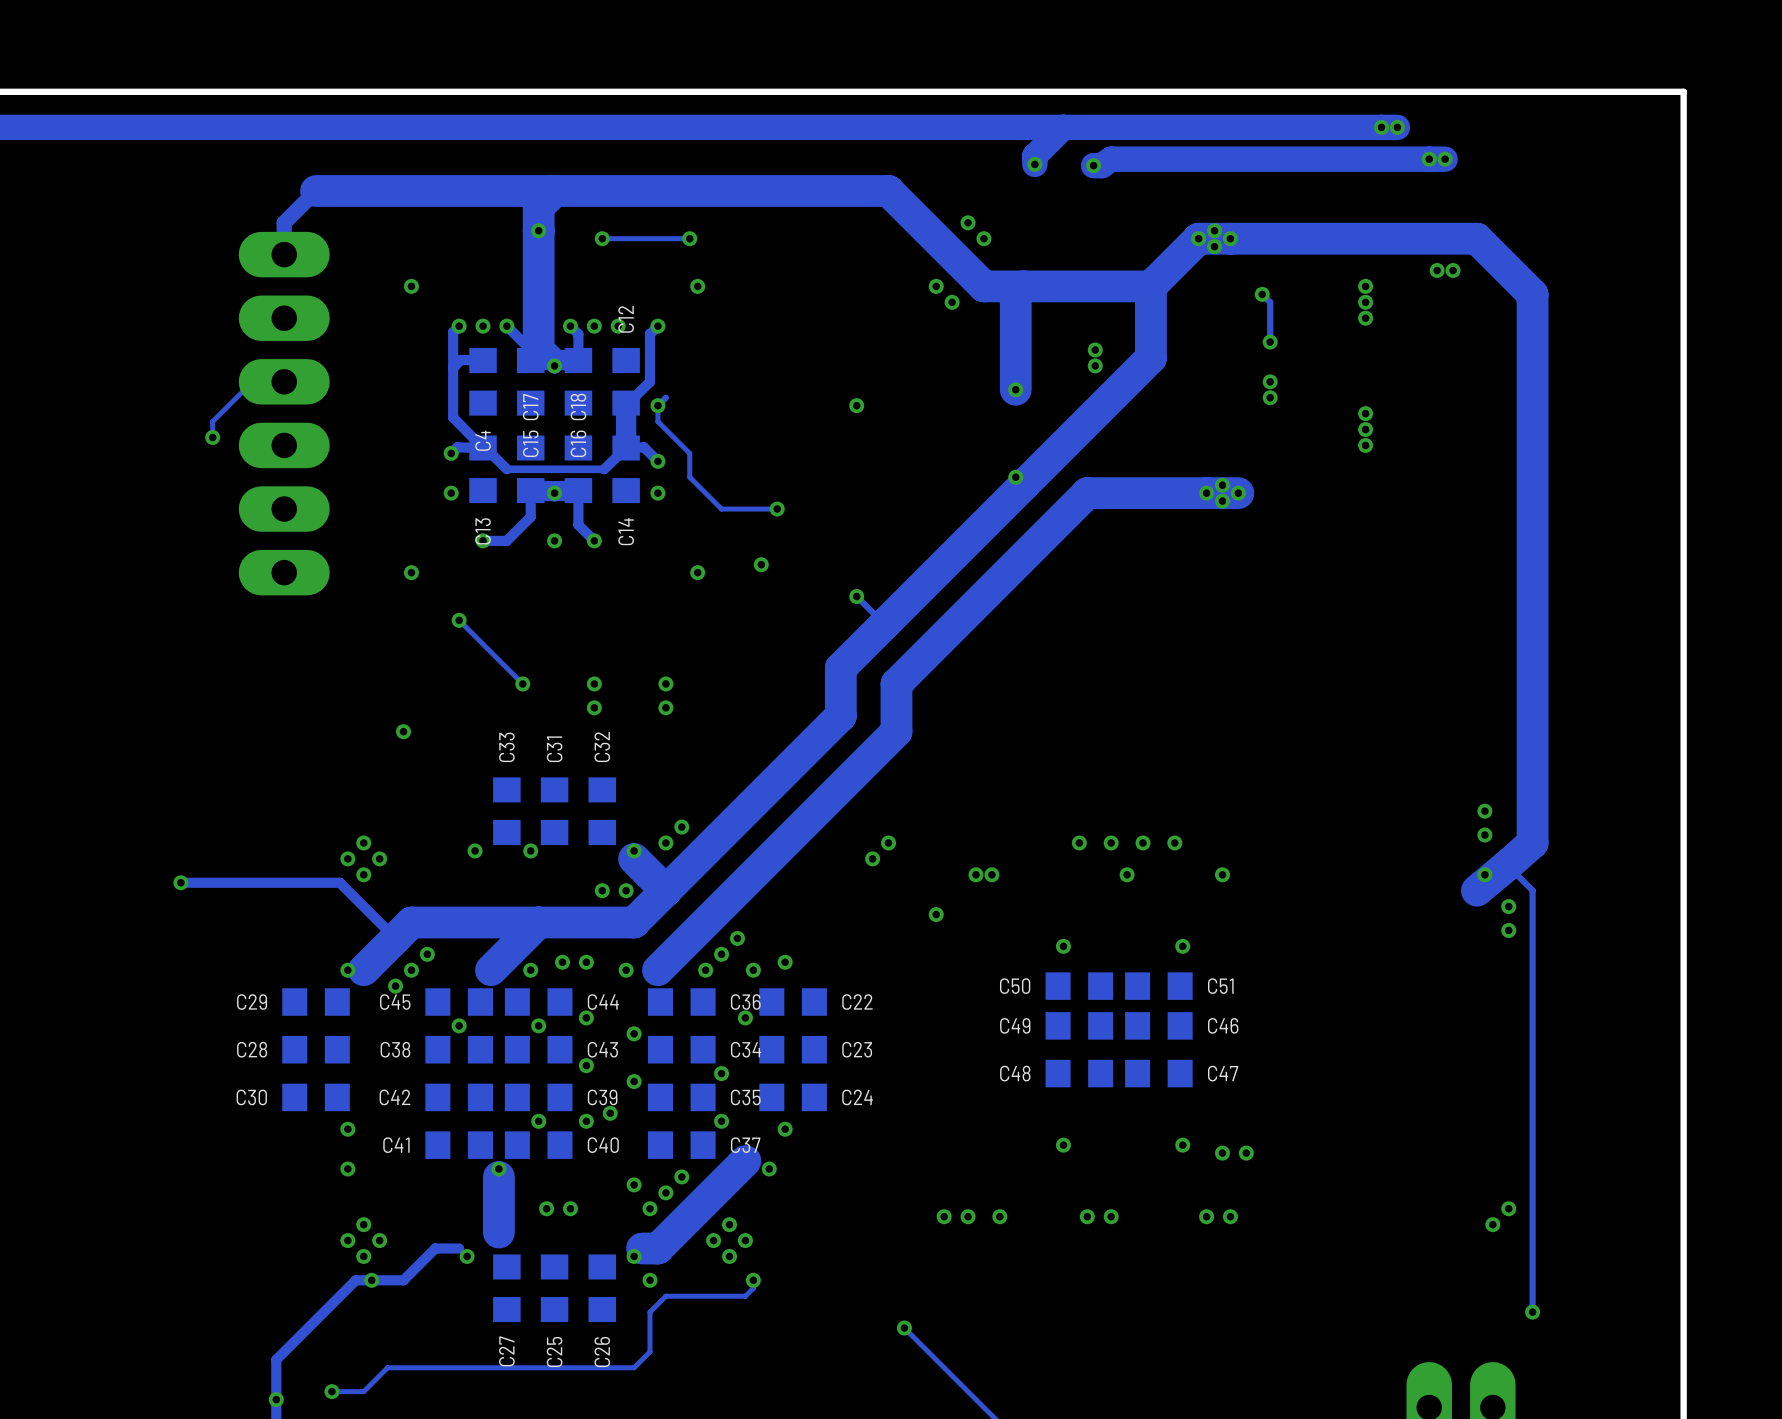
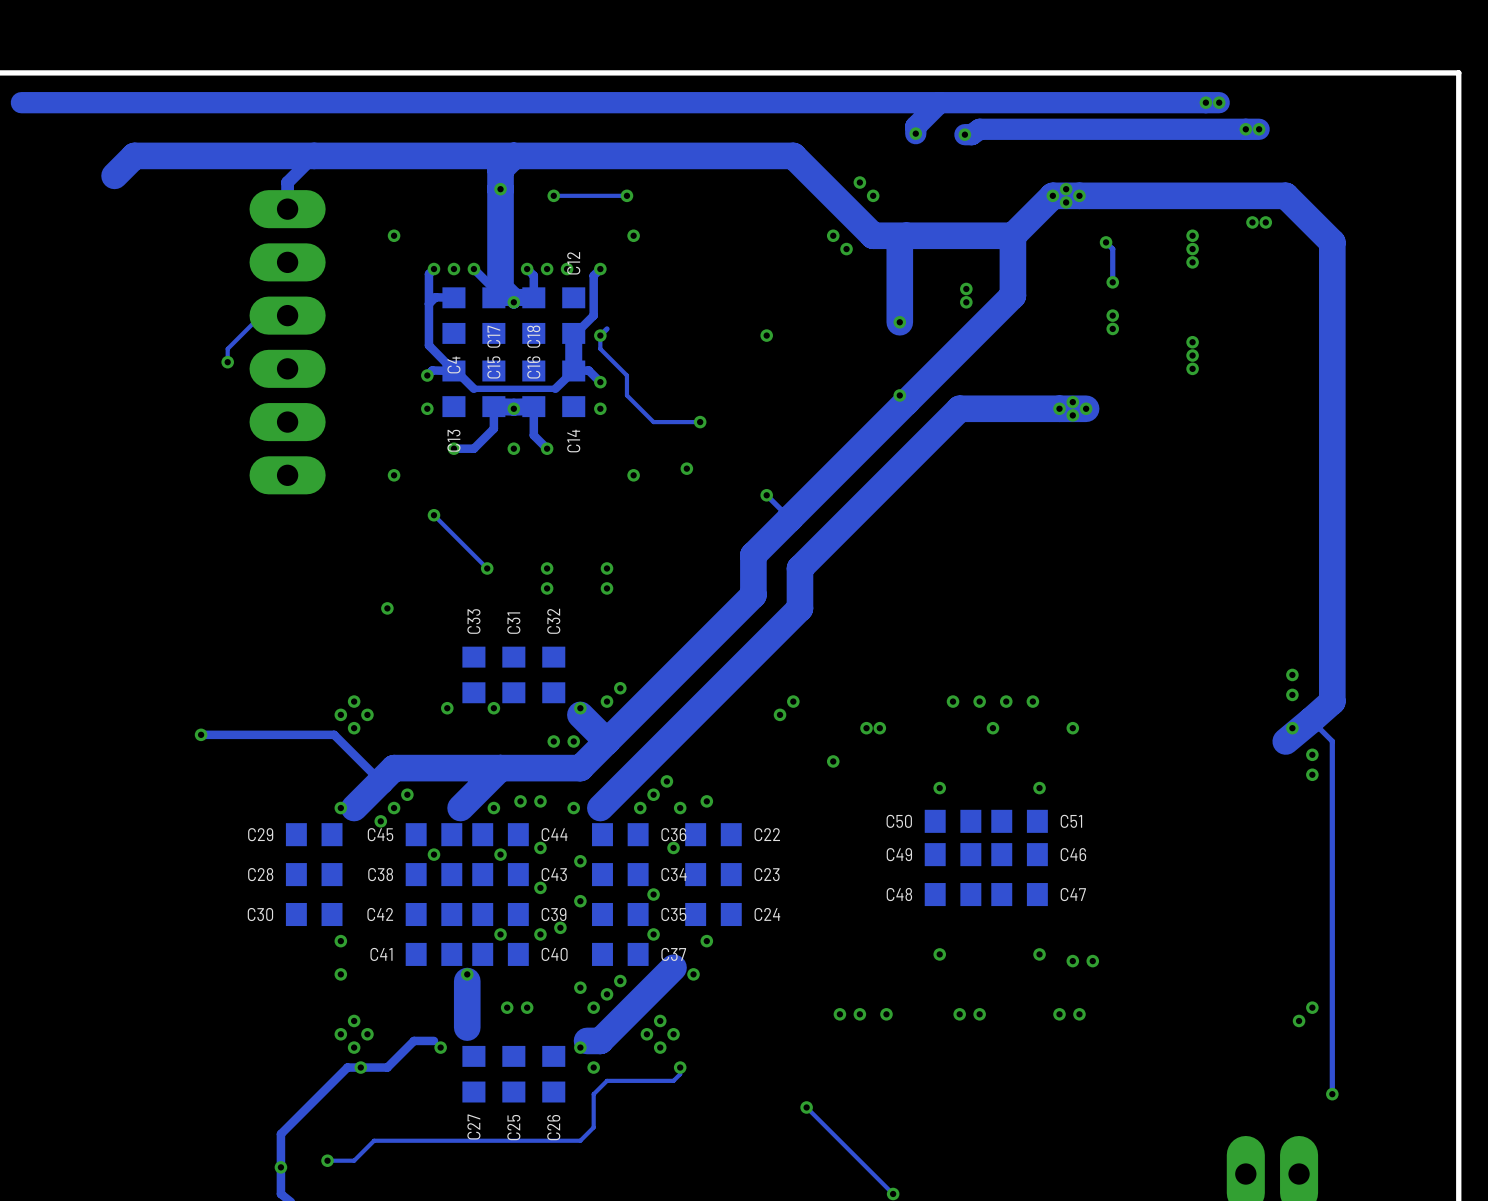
track: none -> (314, 155) (134, 155) (114, 175)

